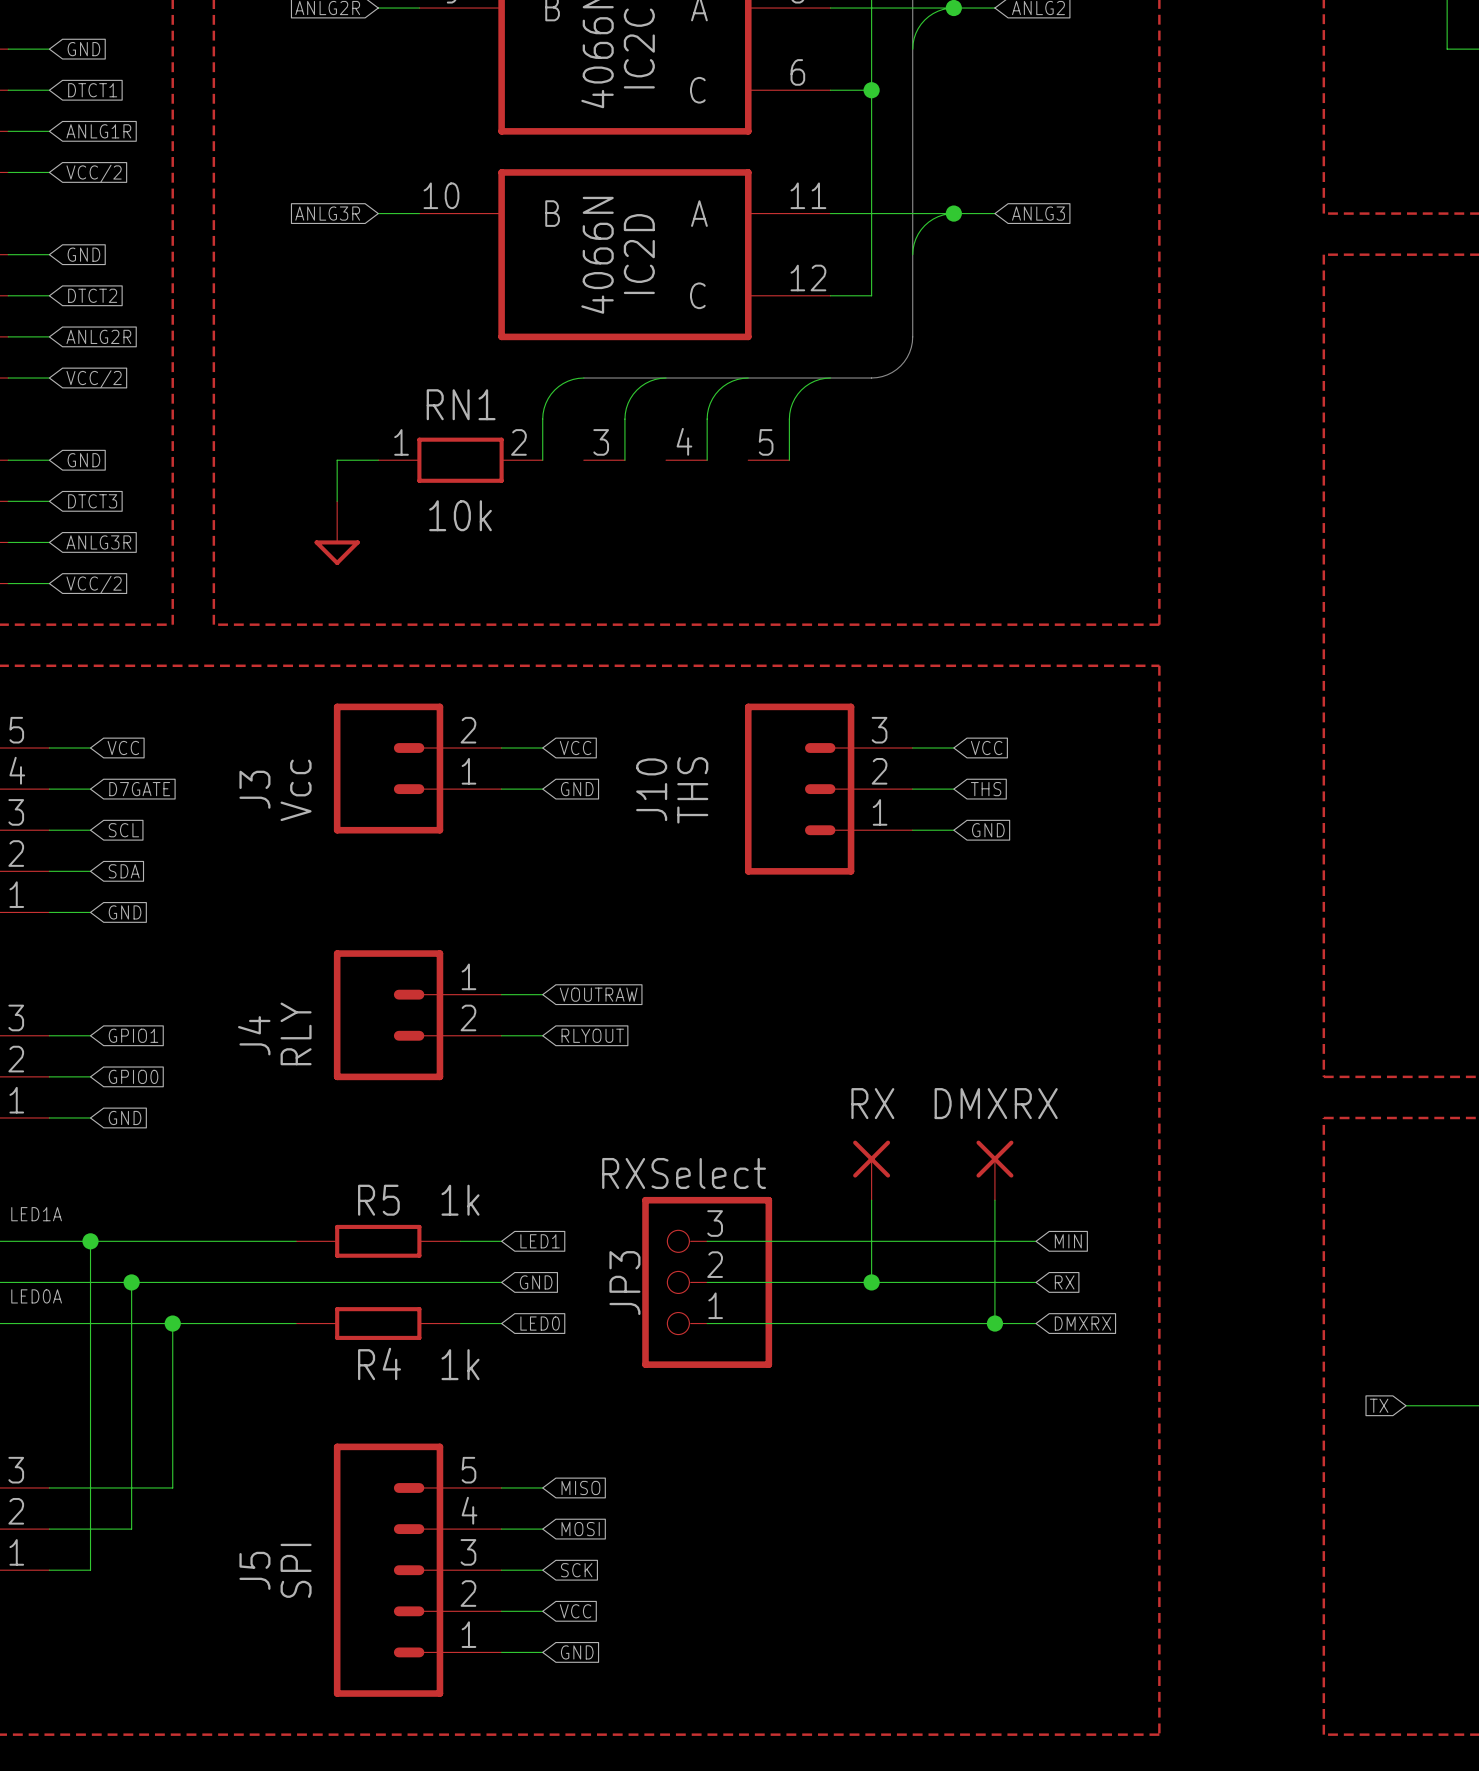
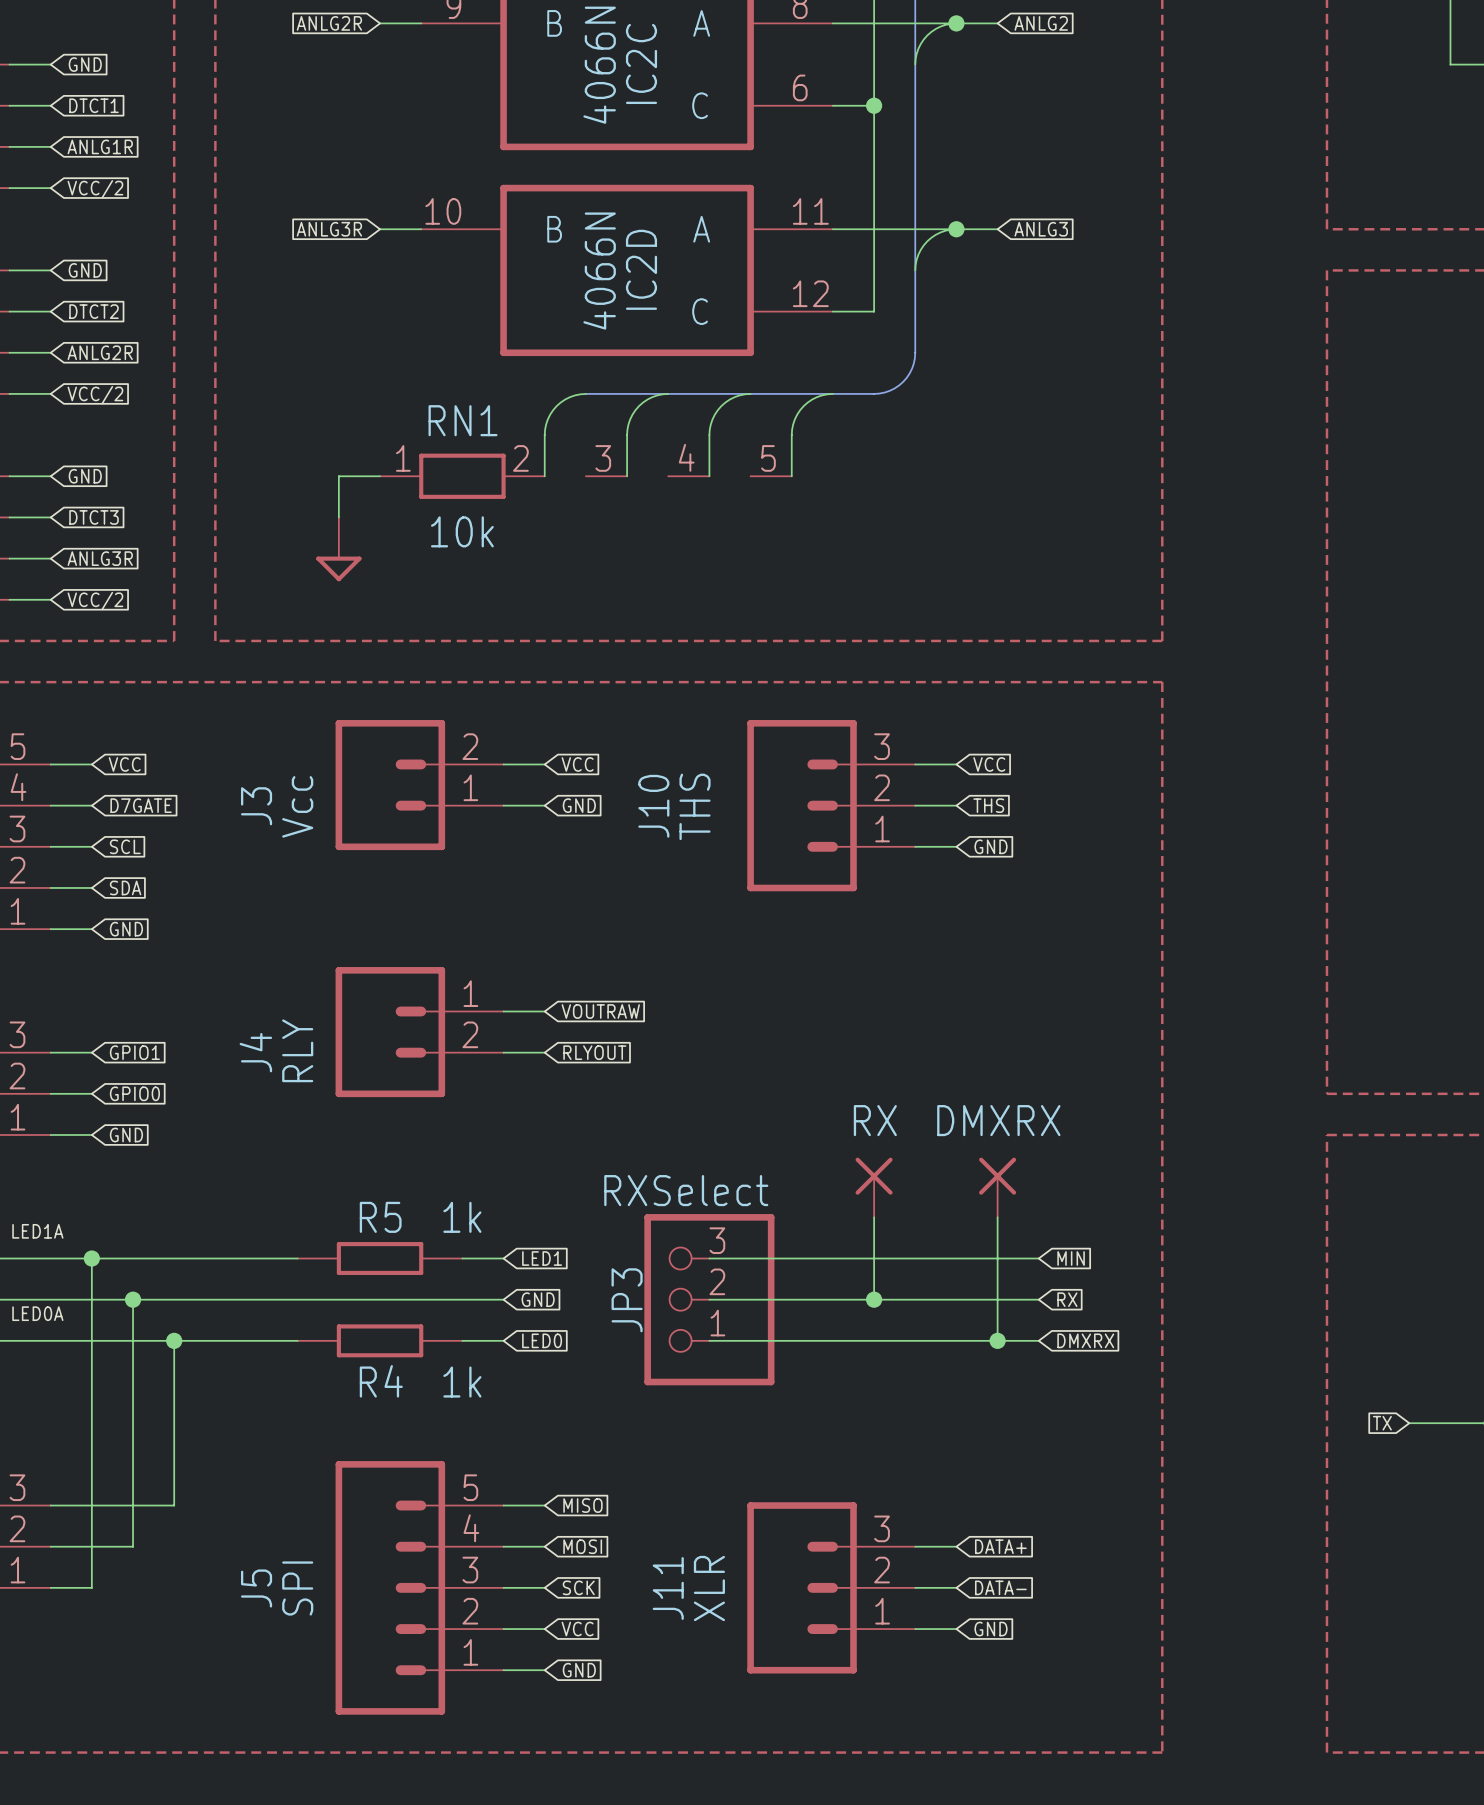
wire: none -> (915, 1546) (956, 1546)
global label: none -> DATA+ (1000, 1546)
J11: none -> XLR (831, 1587)
wire: none -> (915, 1587) (956, 1587)
global label: none -> DATA- (1000, 1587)
wire: none -> (915, 1629) (956, 1629)
global label: none -> GND (991, 1629)

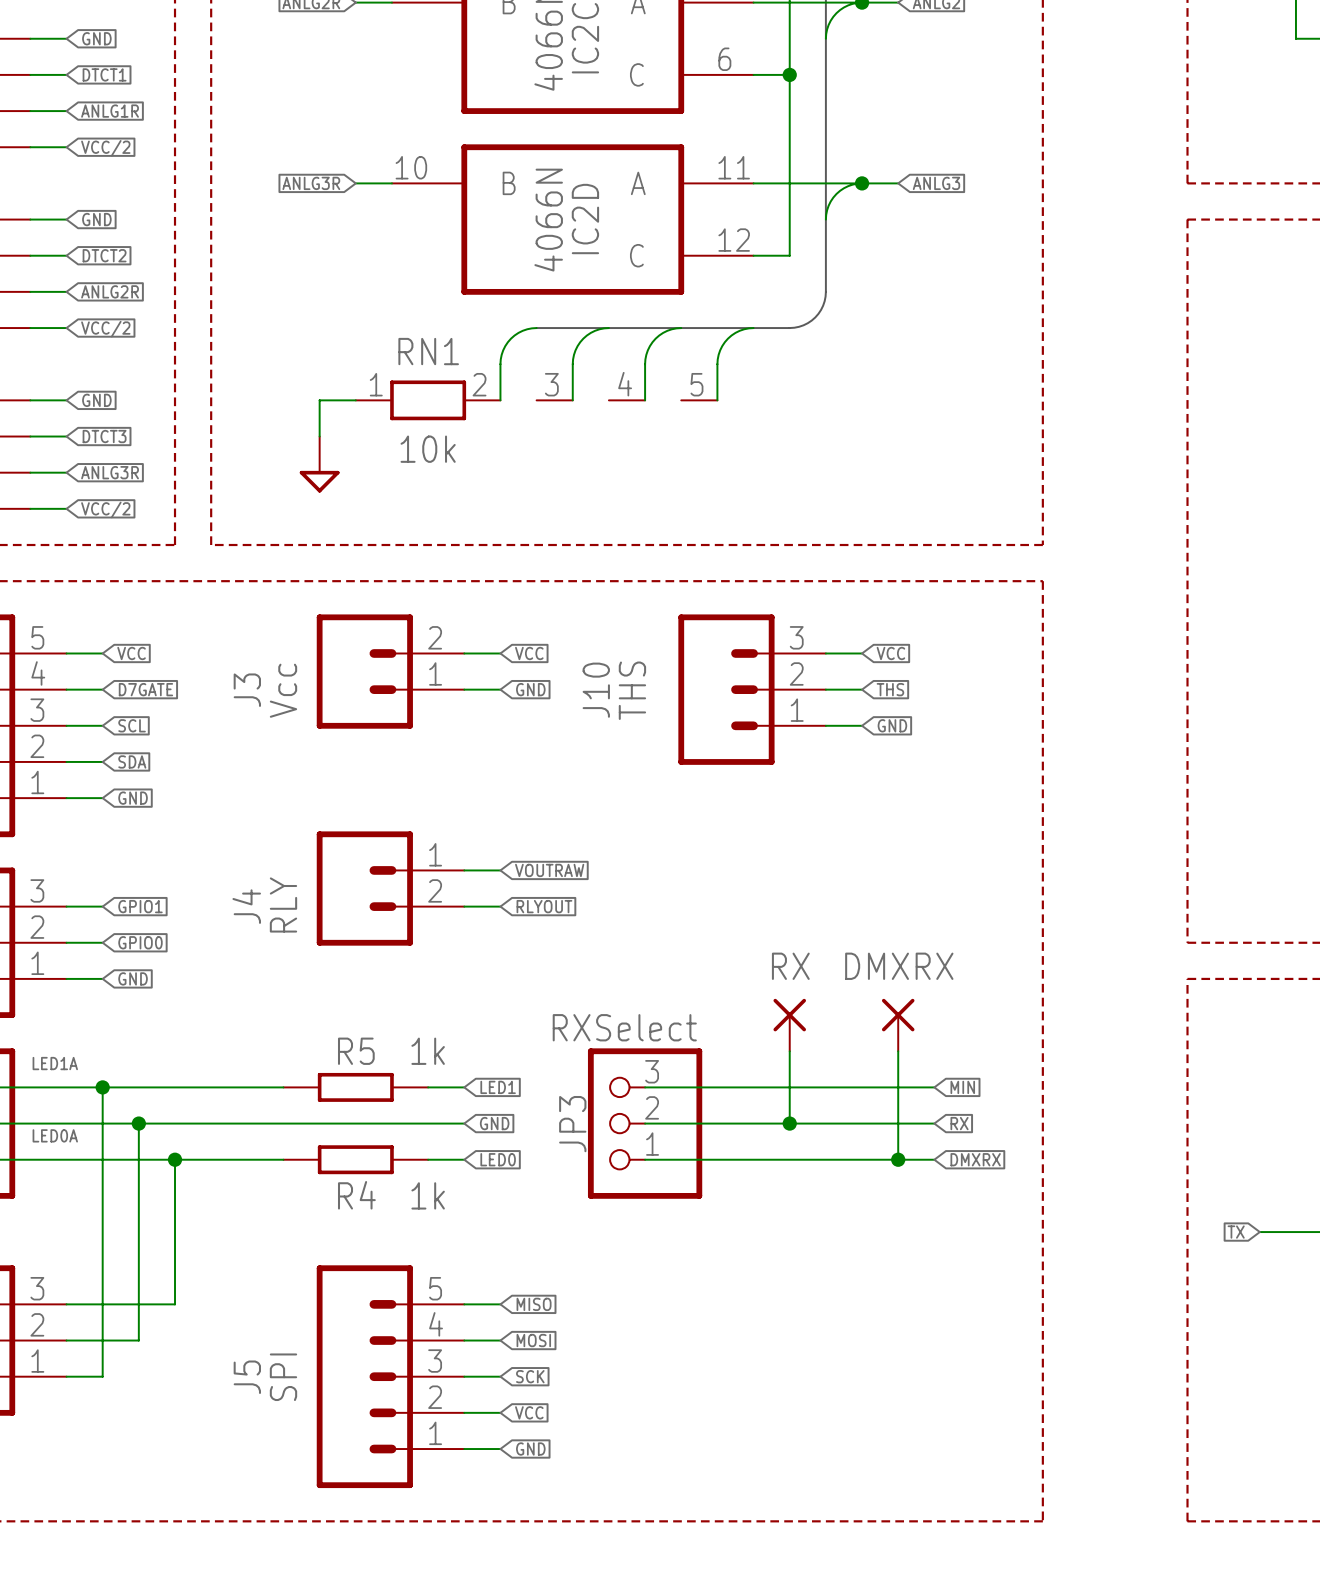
wire: (915, 1546) (956, 1546) -> none
global label: DATA+ (1000, 1546) -> none
J11: XLR (831, 1587) -> none
wire: (915, 1587) (956, 1587) -> none
global label: DATA- (1000, 1587) -> none
wire: (915, 1629) (956, 1629) -> none
global label: GND (991, 1629) -> none

